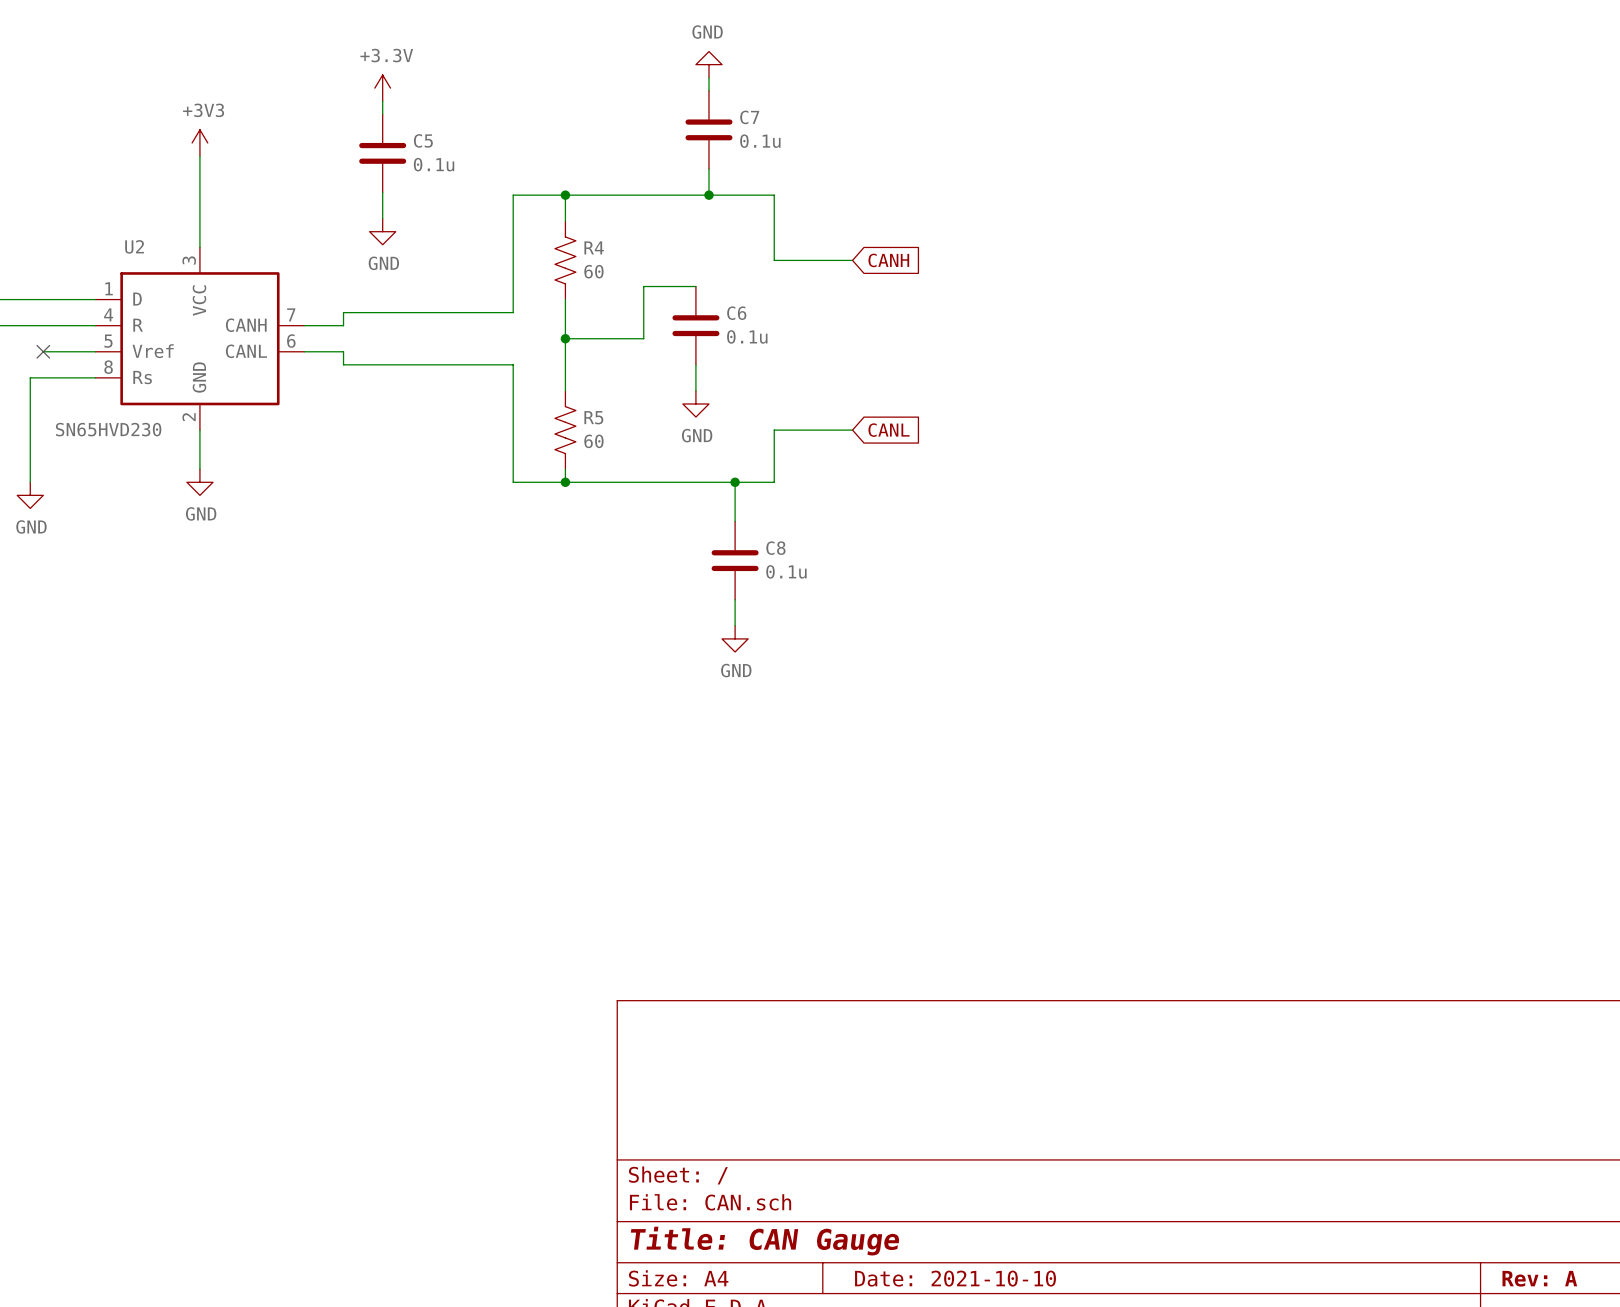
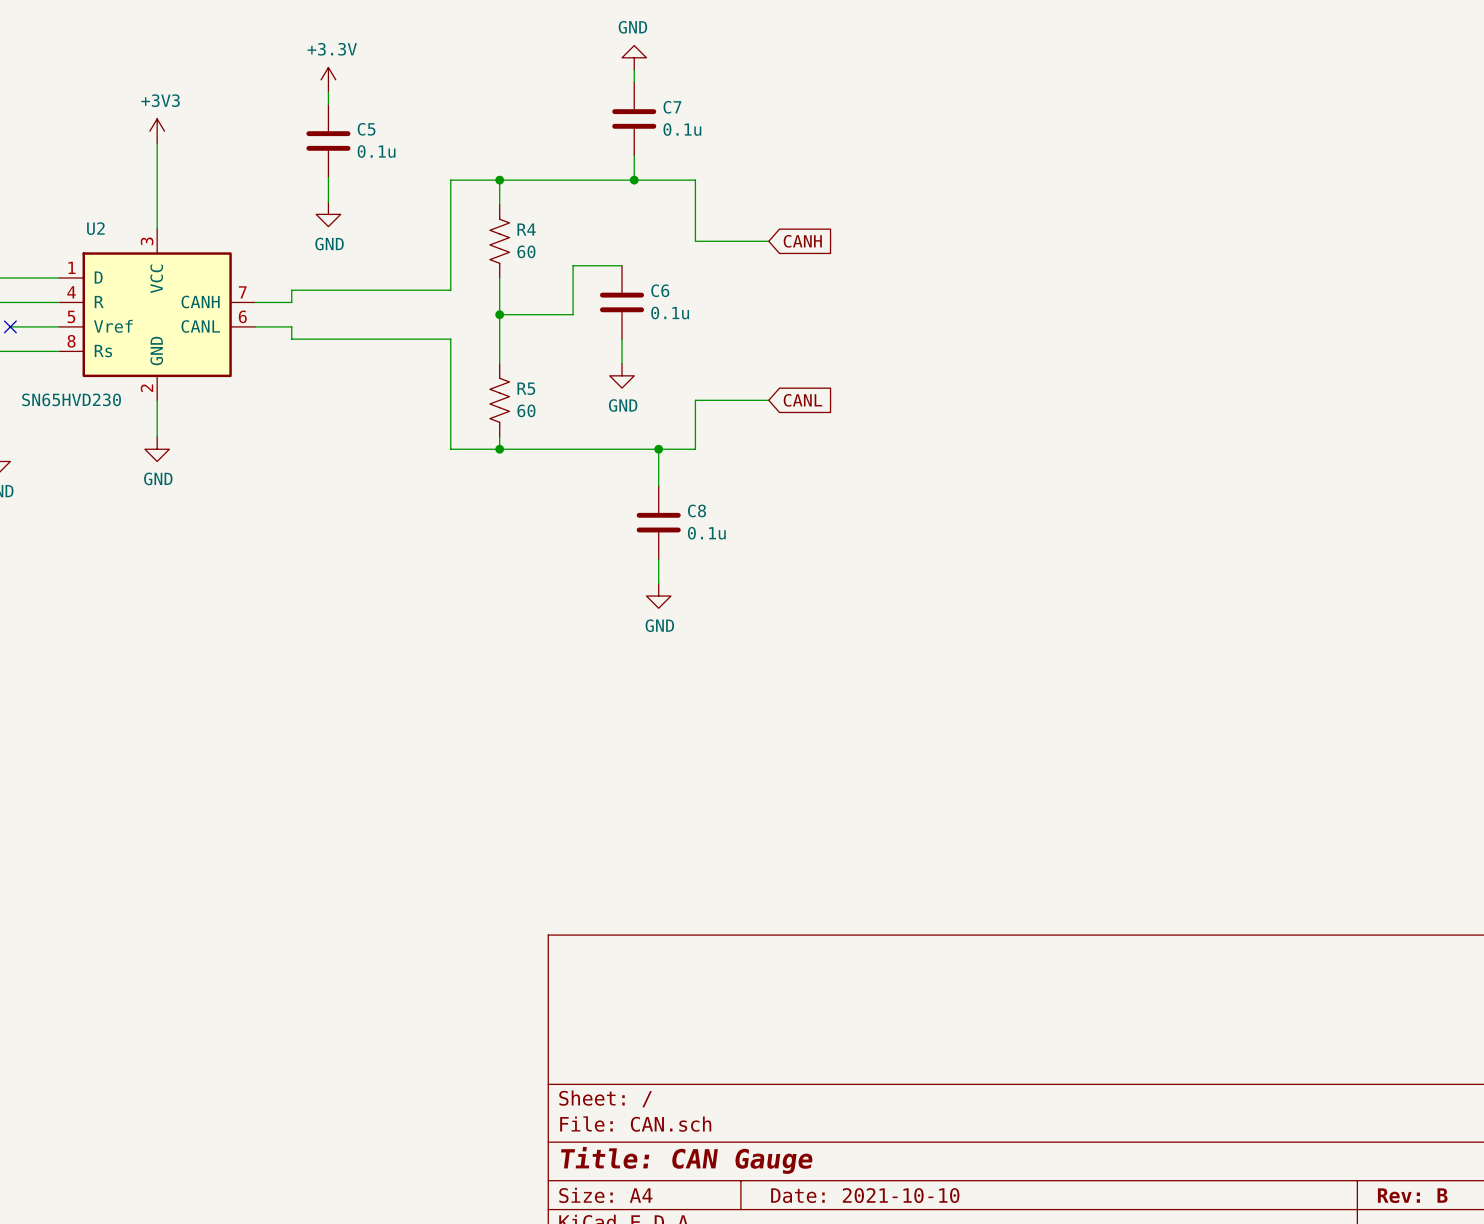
title block: Rev: A (1539, 1278) -> Rev: B (1412, 1195)

